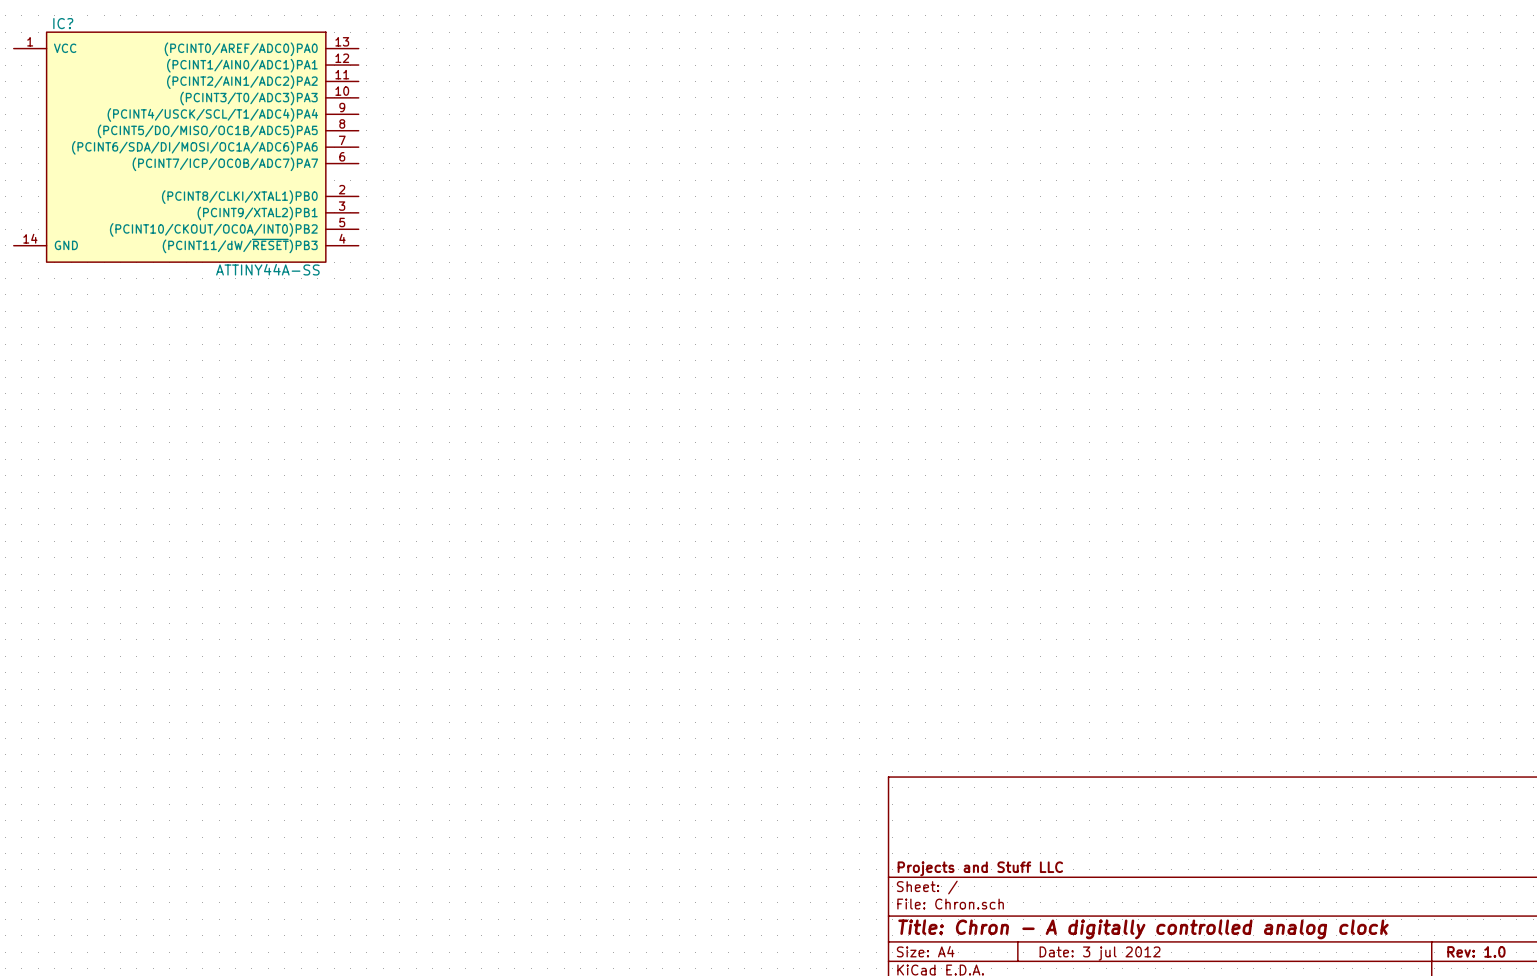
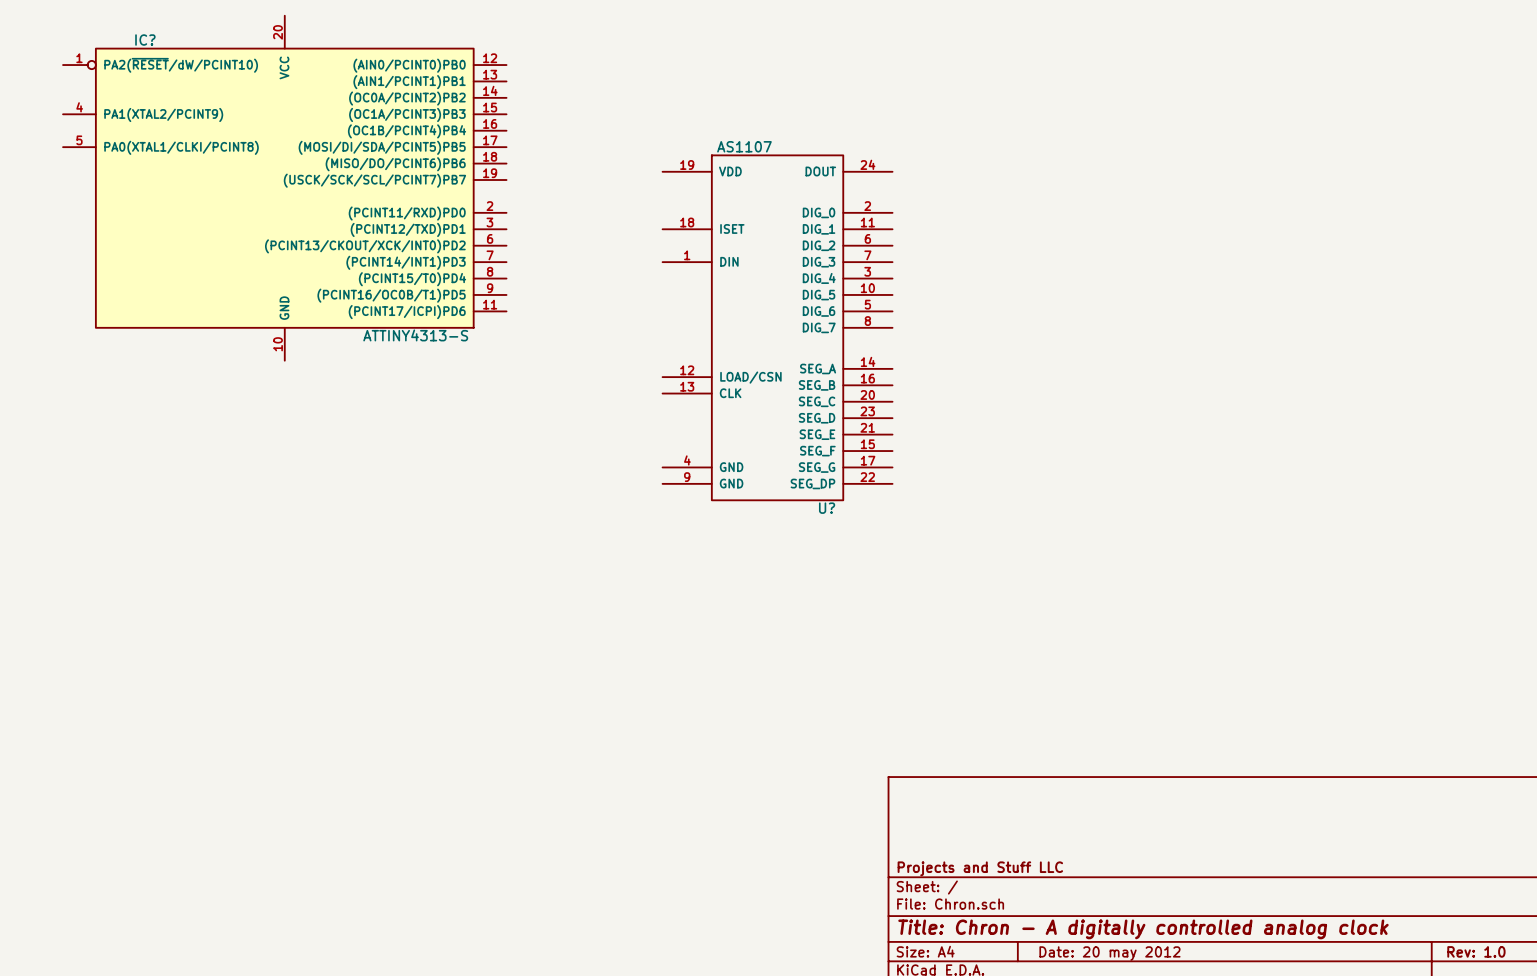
IC?: ATTINY44A-SS (186, 147) -> none
IC?: none -> ATTINY4313-S (284, 188)
U?: none -> AS1107 (777, 327)
title block: Date: 3 jul 2012 (1100, 953) -> Date: 20 may 2012 (1109, 953)

